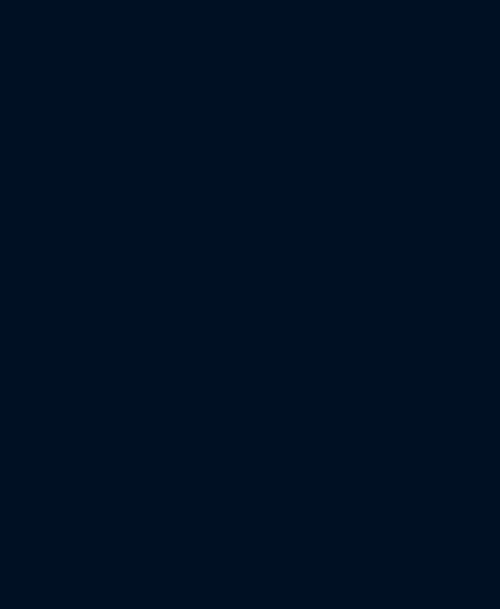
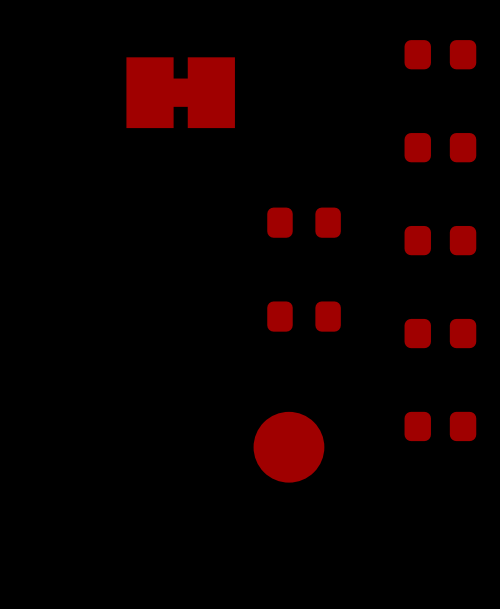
part: none -> (440, 54)
part: none -> (180, 92)
part: none -> (440, 147)
part: none -> (304, 222)
part: none -> (440, 240)
part: none -> (304, 316)
part: none -> (440, 333)
part: none -> (440, 426)
part: none -> (288, 447)

